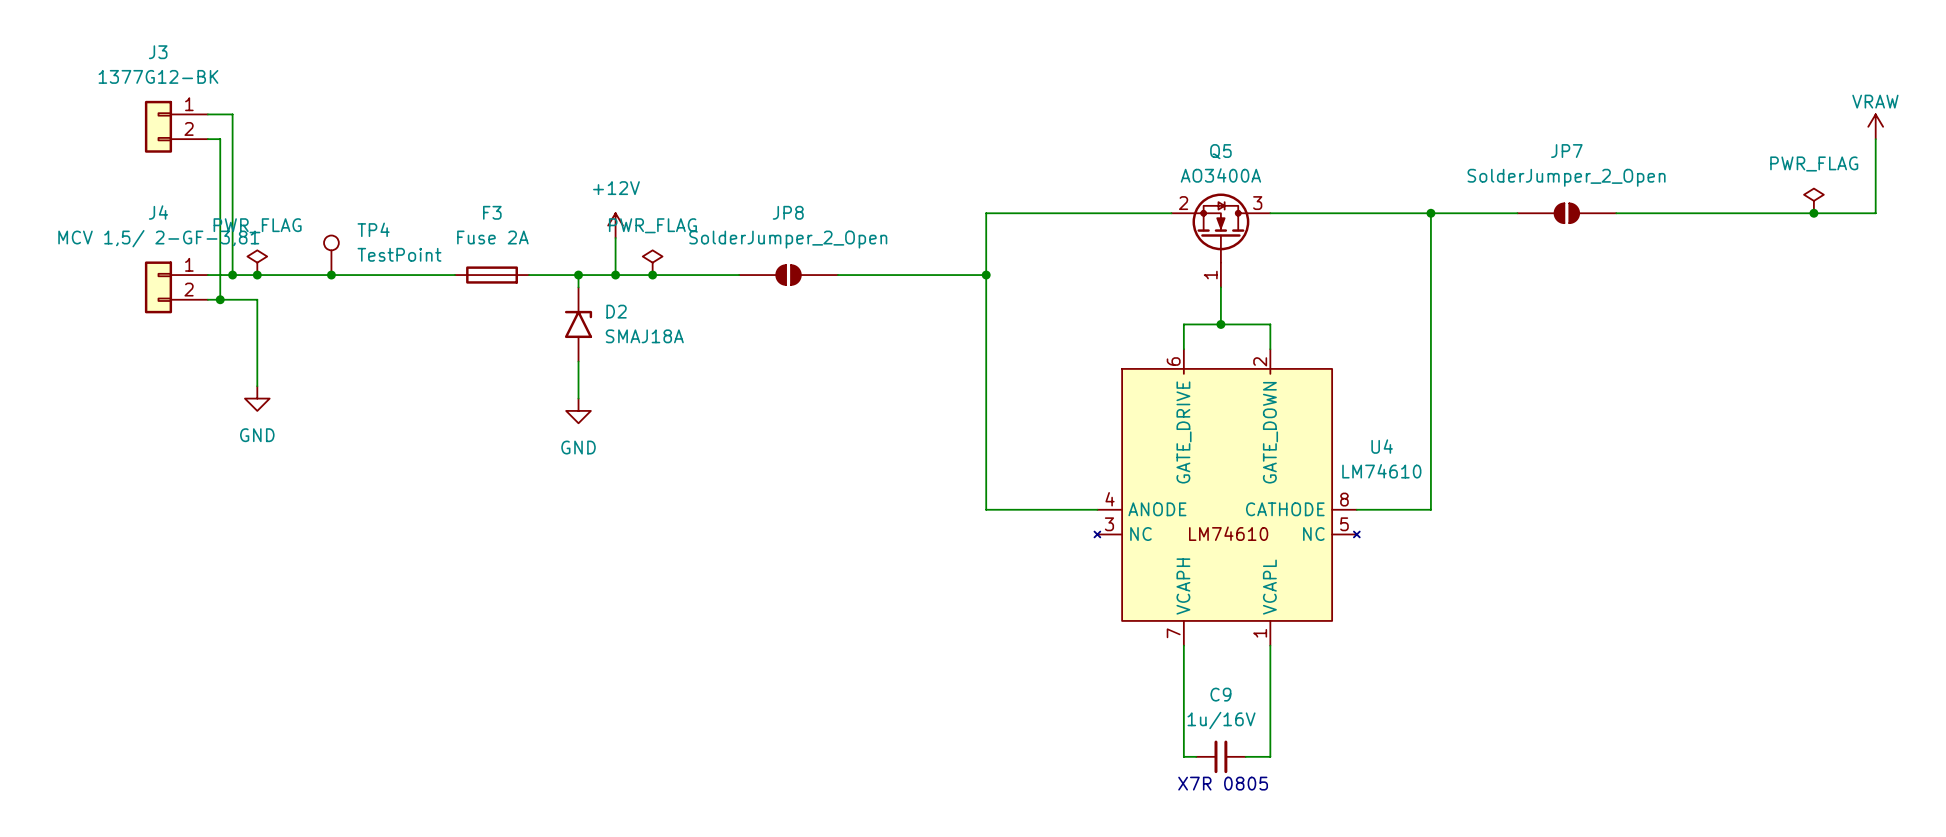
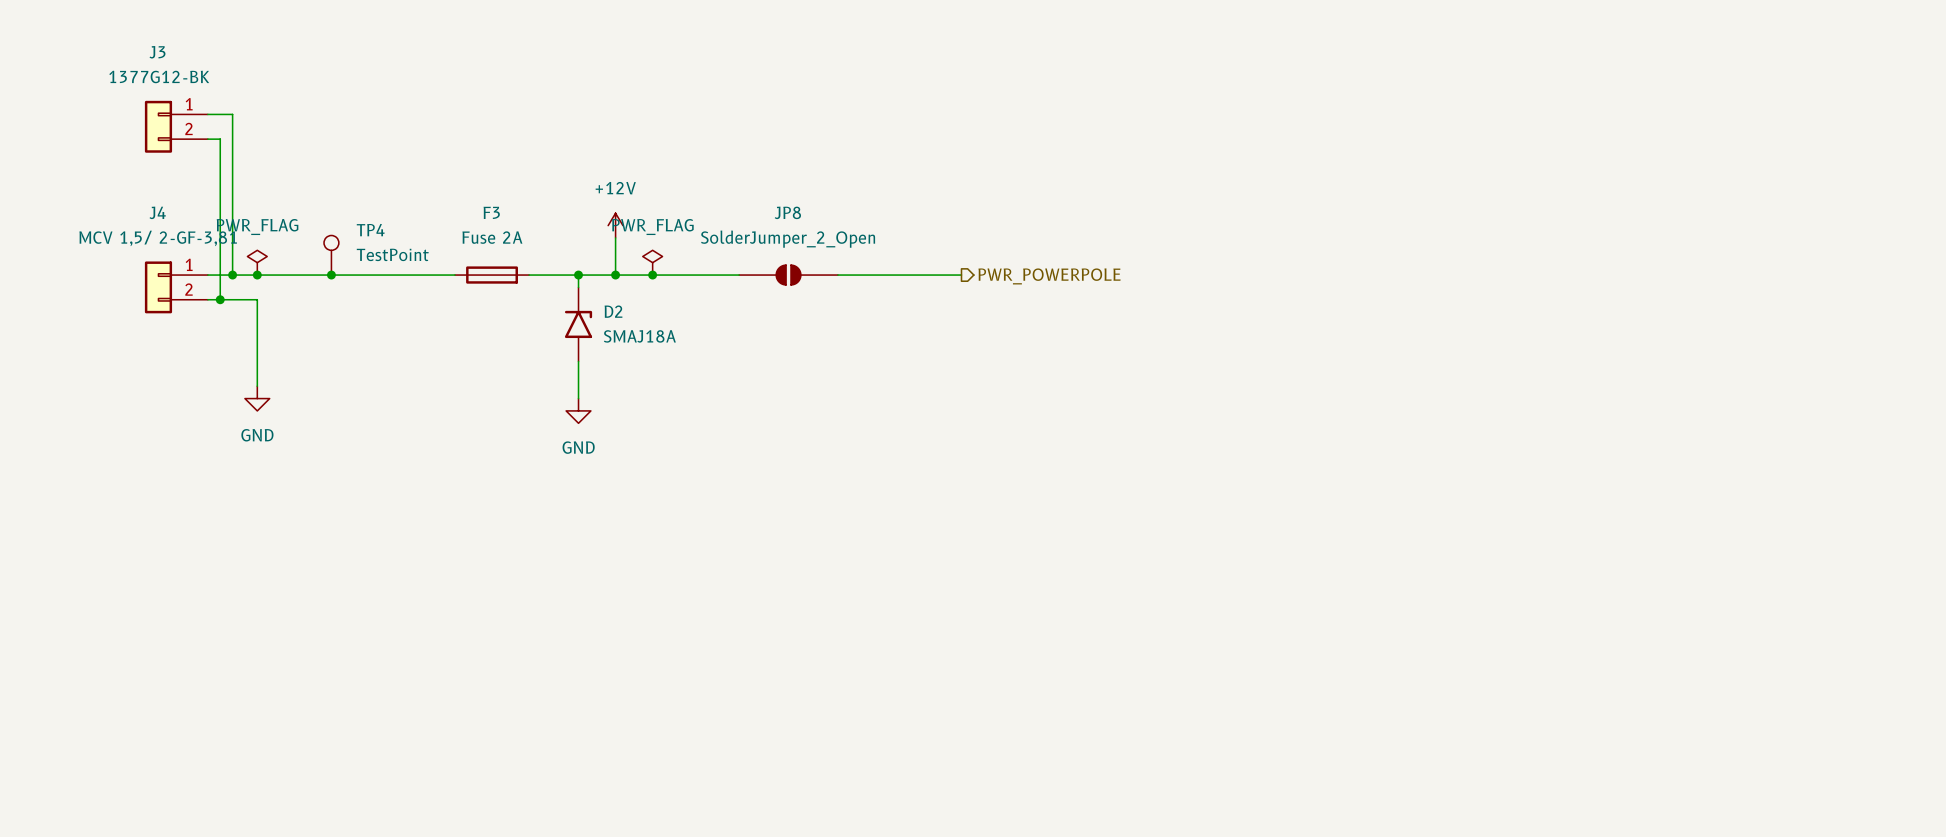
power symbol: VRAW (1875, 126) -> none
wire: (1875, 139) (1875, 213) (1616, 213) -> none
power symbol: PWR_FLAG (1813, 200) -> none
wire: (1171, 213) (986, 213) (986, 509) (1097, 509) -> none
wire: (1270, 213) (1517, 213) -> none
wire: (1430, 213) (1430, 509) (1356, 509) -> none
junction: (1430, 213) -> none
JP7: SolderJumper_2_Open (1566, 213) -> none
junction: (1813, 213) -> none
Q5: AO3400A (1220, 240) -> none
wire: (961, 275) (986, 275) -> none
junction: (986, 275) -> none
hierarchical label: none -> PWR_POWERPOLE (1049, 276)
wire: (1220, 287) (1220, 324) -> none
junction: (1220, 324) -> none
wire: (1183, 349) (1183, 324) (1270, 324) (1270, 349) -> none
U4: LM74610 (1227, 497) -> none
wire: (1183, 645) (1183, 756) (1196, 756) -> none
wire: (1270, 645) (1270, 756) (1245, 756) -> none
C9: 1u/16V (1220, 756) -> none
text: X7R 0805 (1223, 783) -> none

